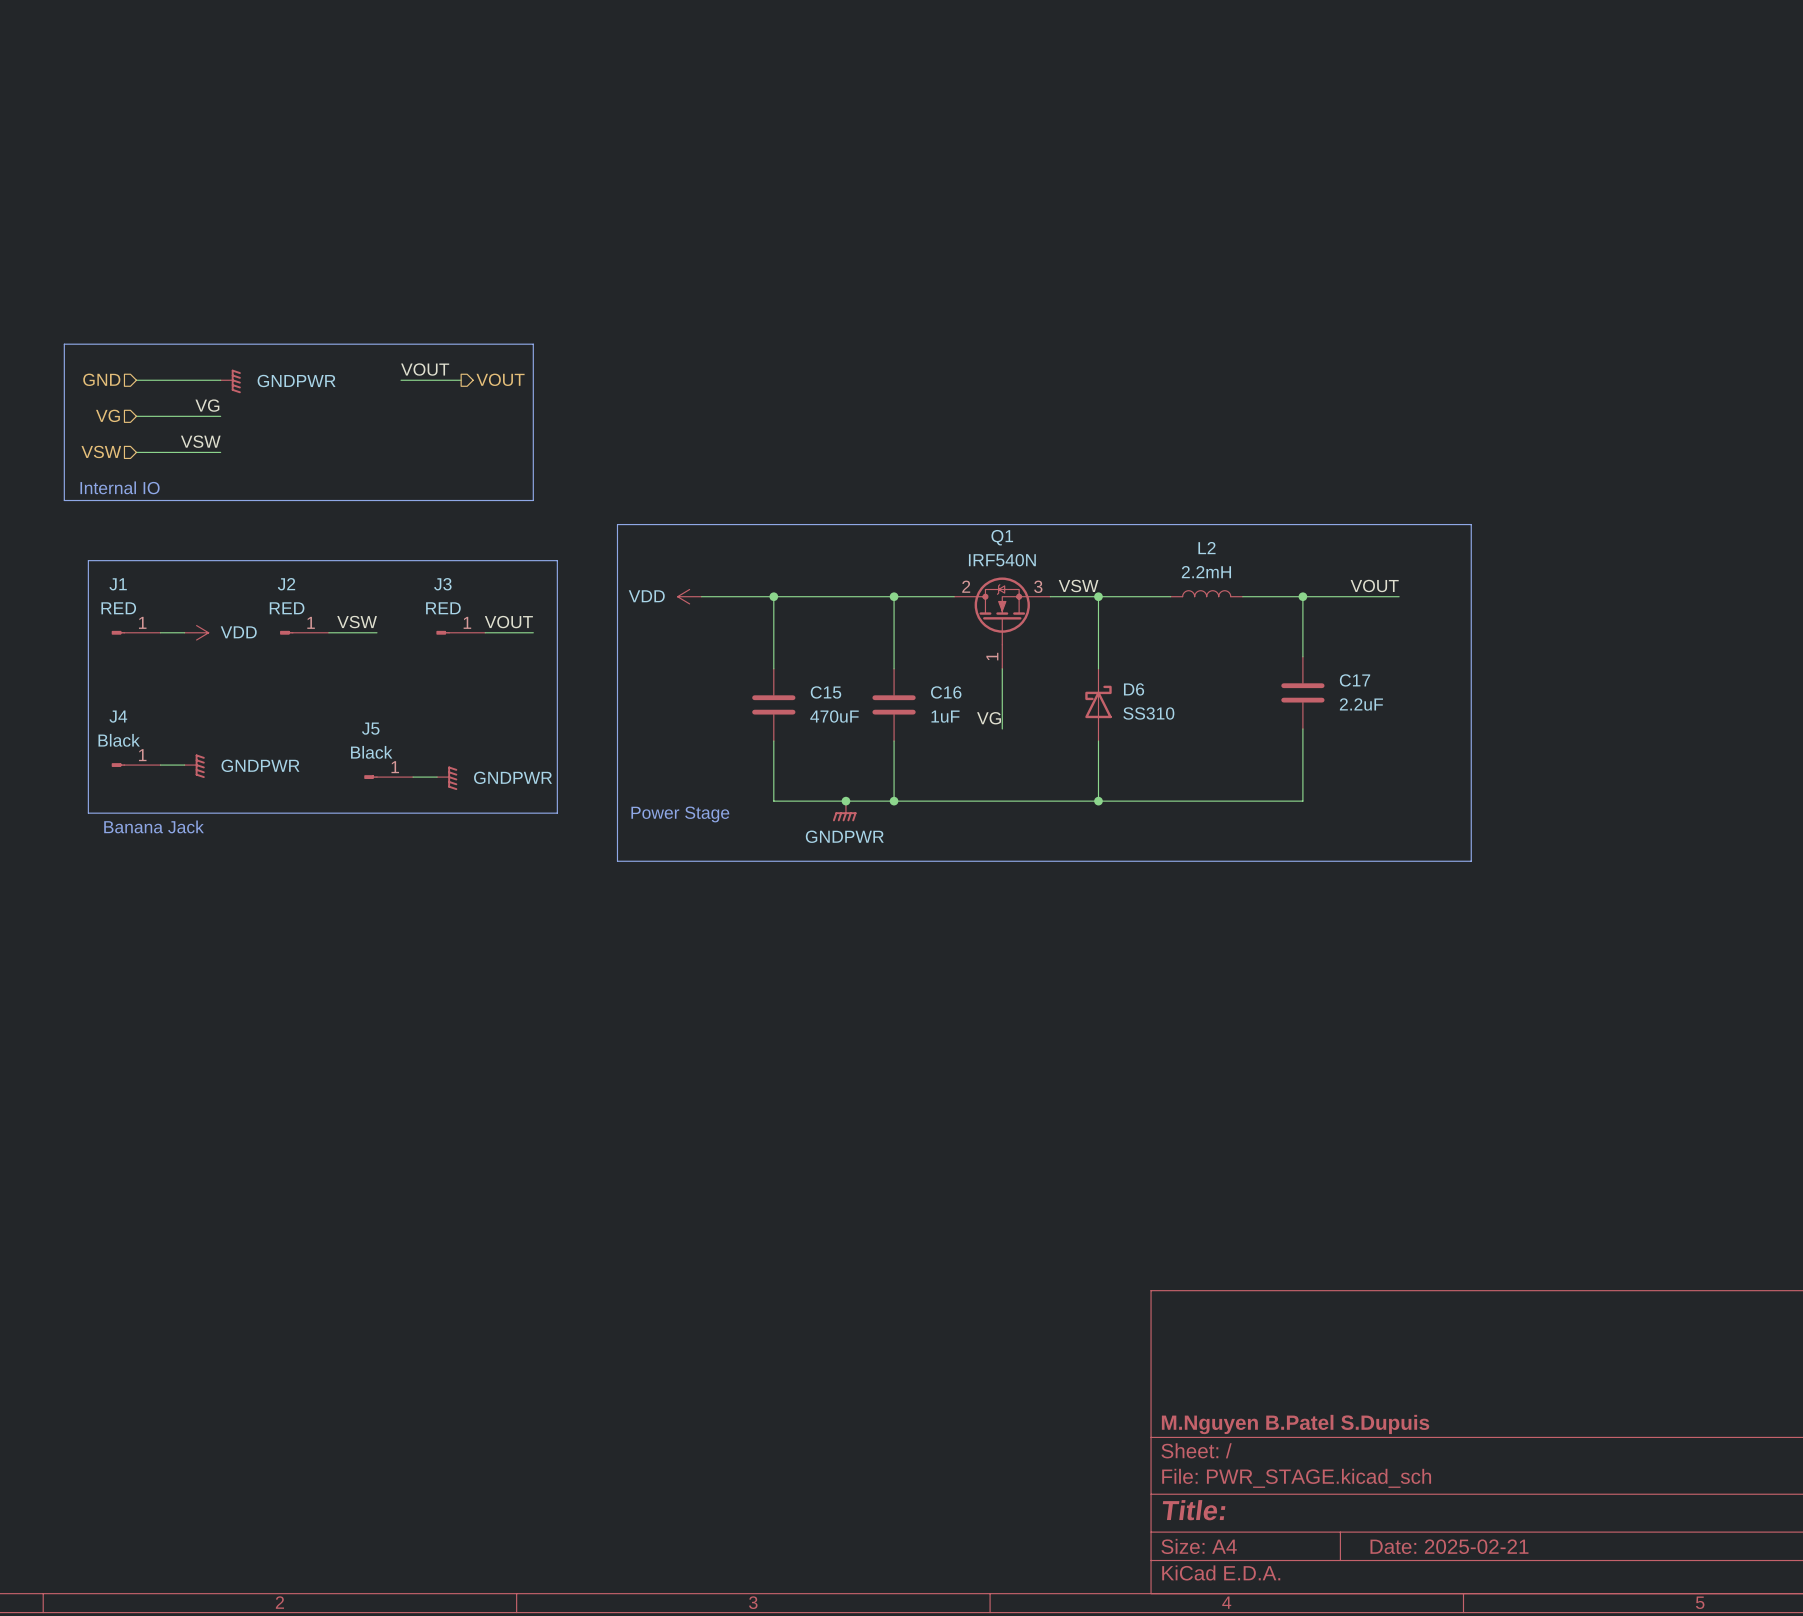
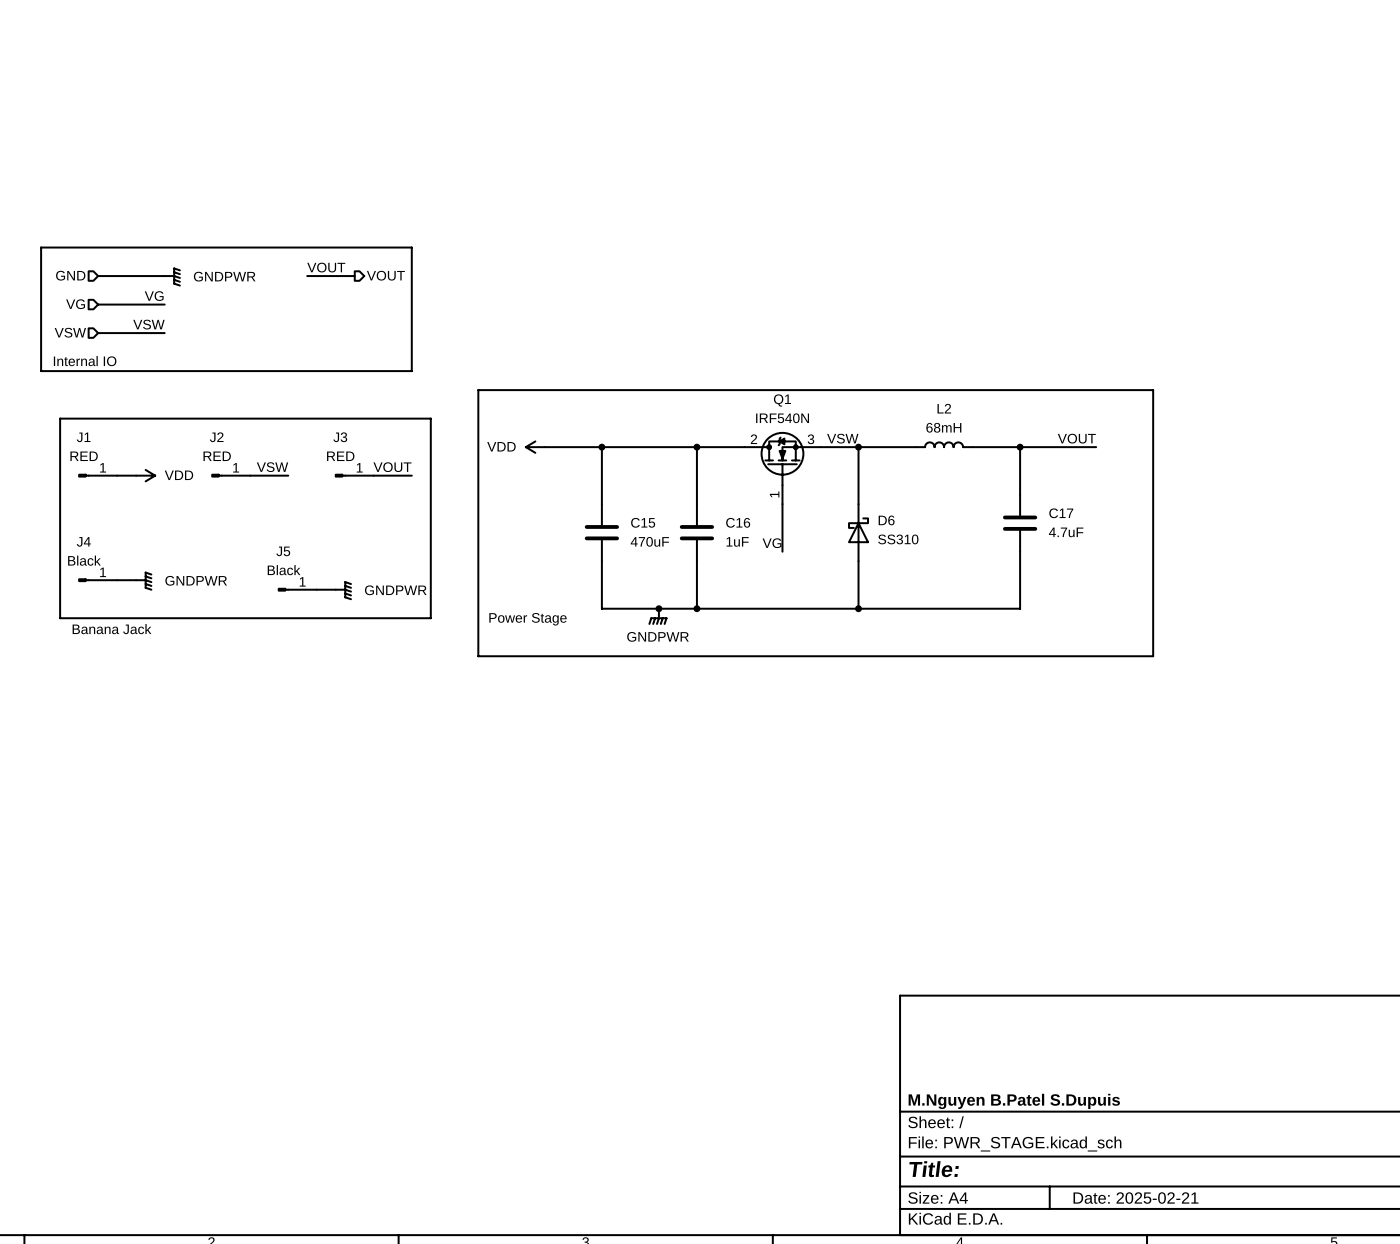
L2 value: 2.2mH (1206, 572) -> 68mH (943, 427)
C17 value: 2.2uF (1361, 704) -> 4.7uF (1066, 532)

